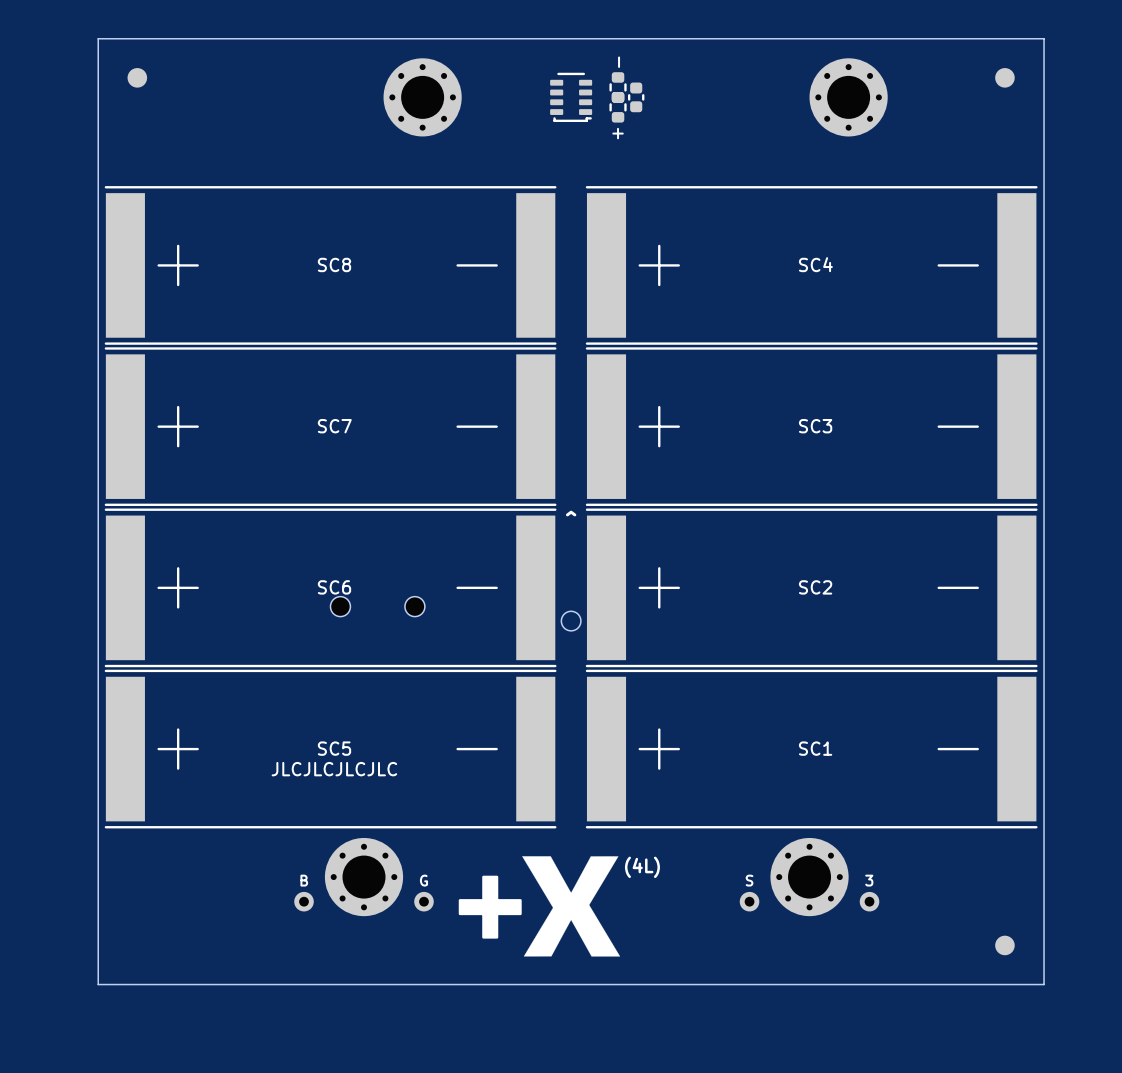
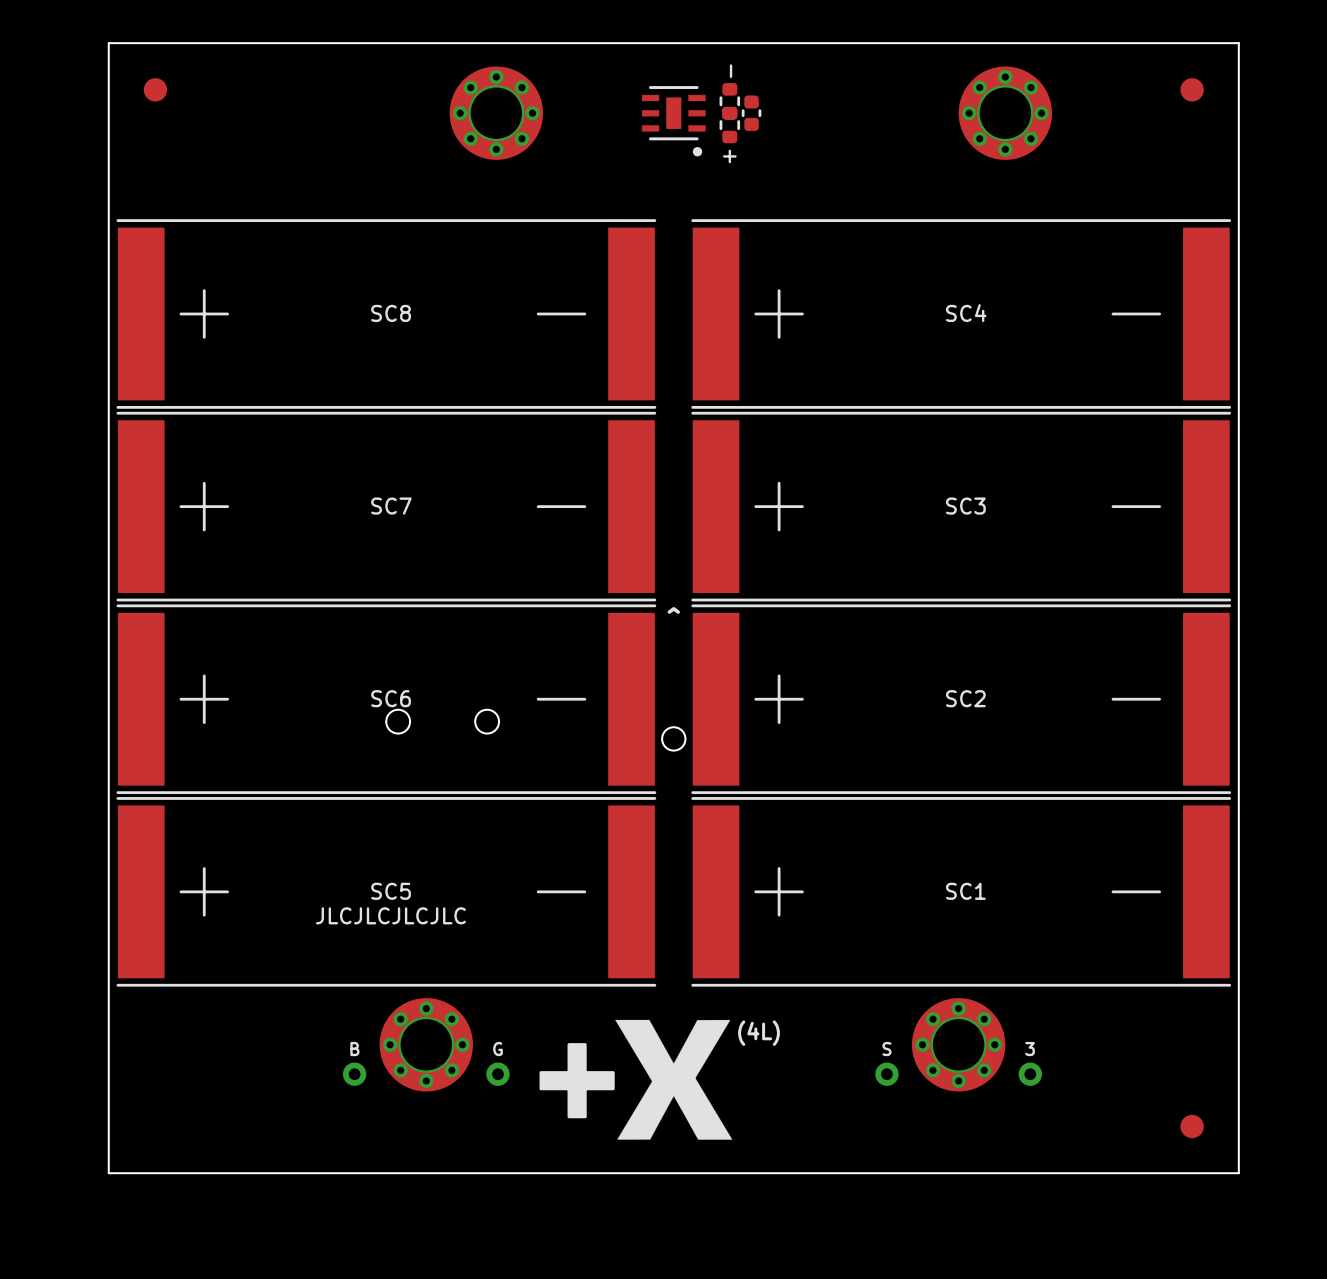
part footprint: [550, 72, 593, 123] -> [641, 86, 706, 157]

